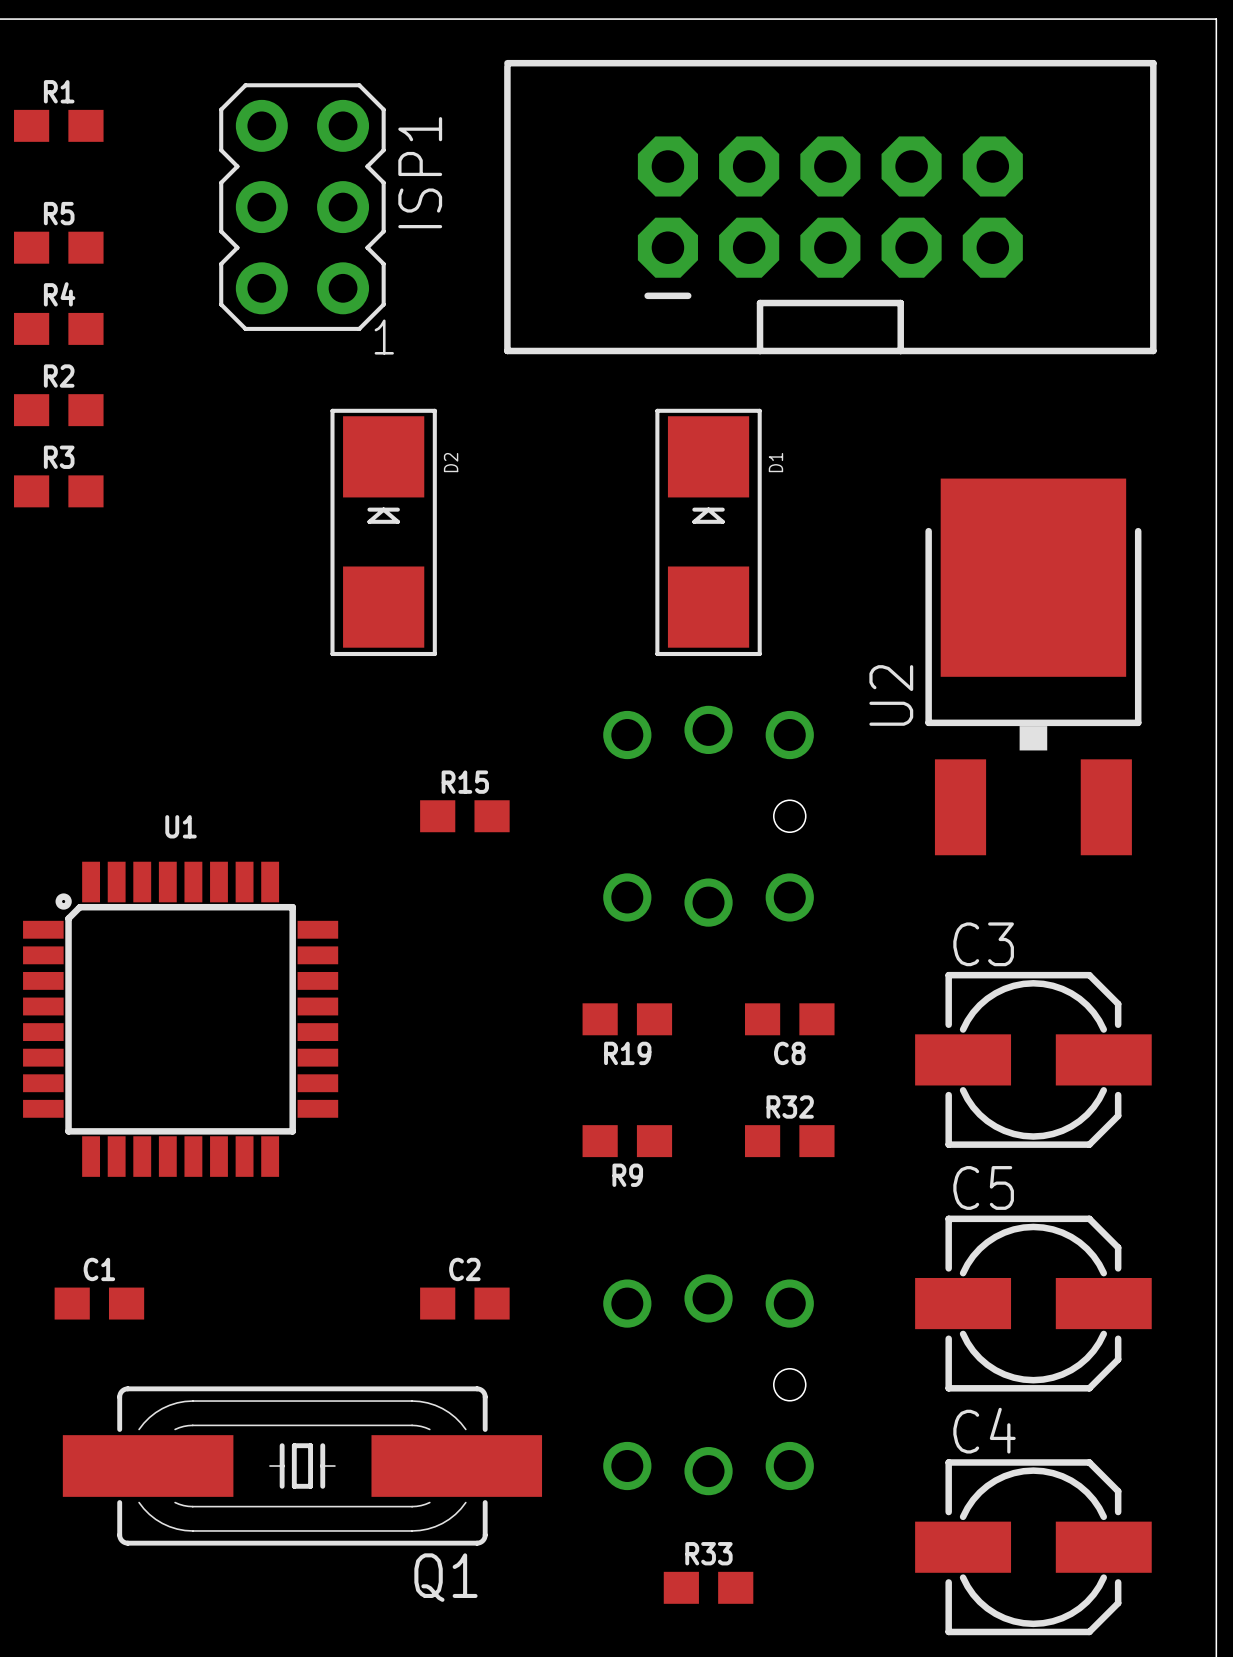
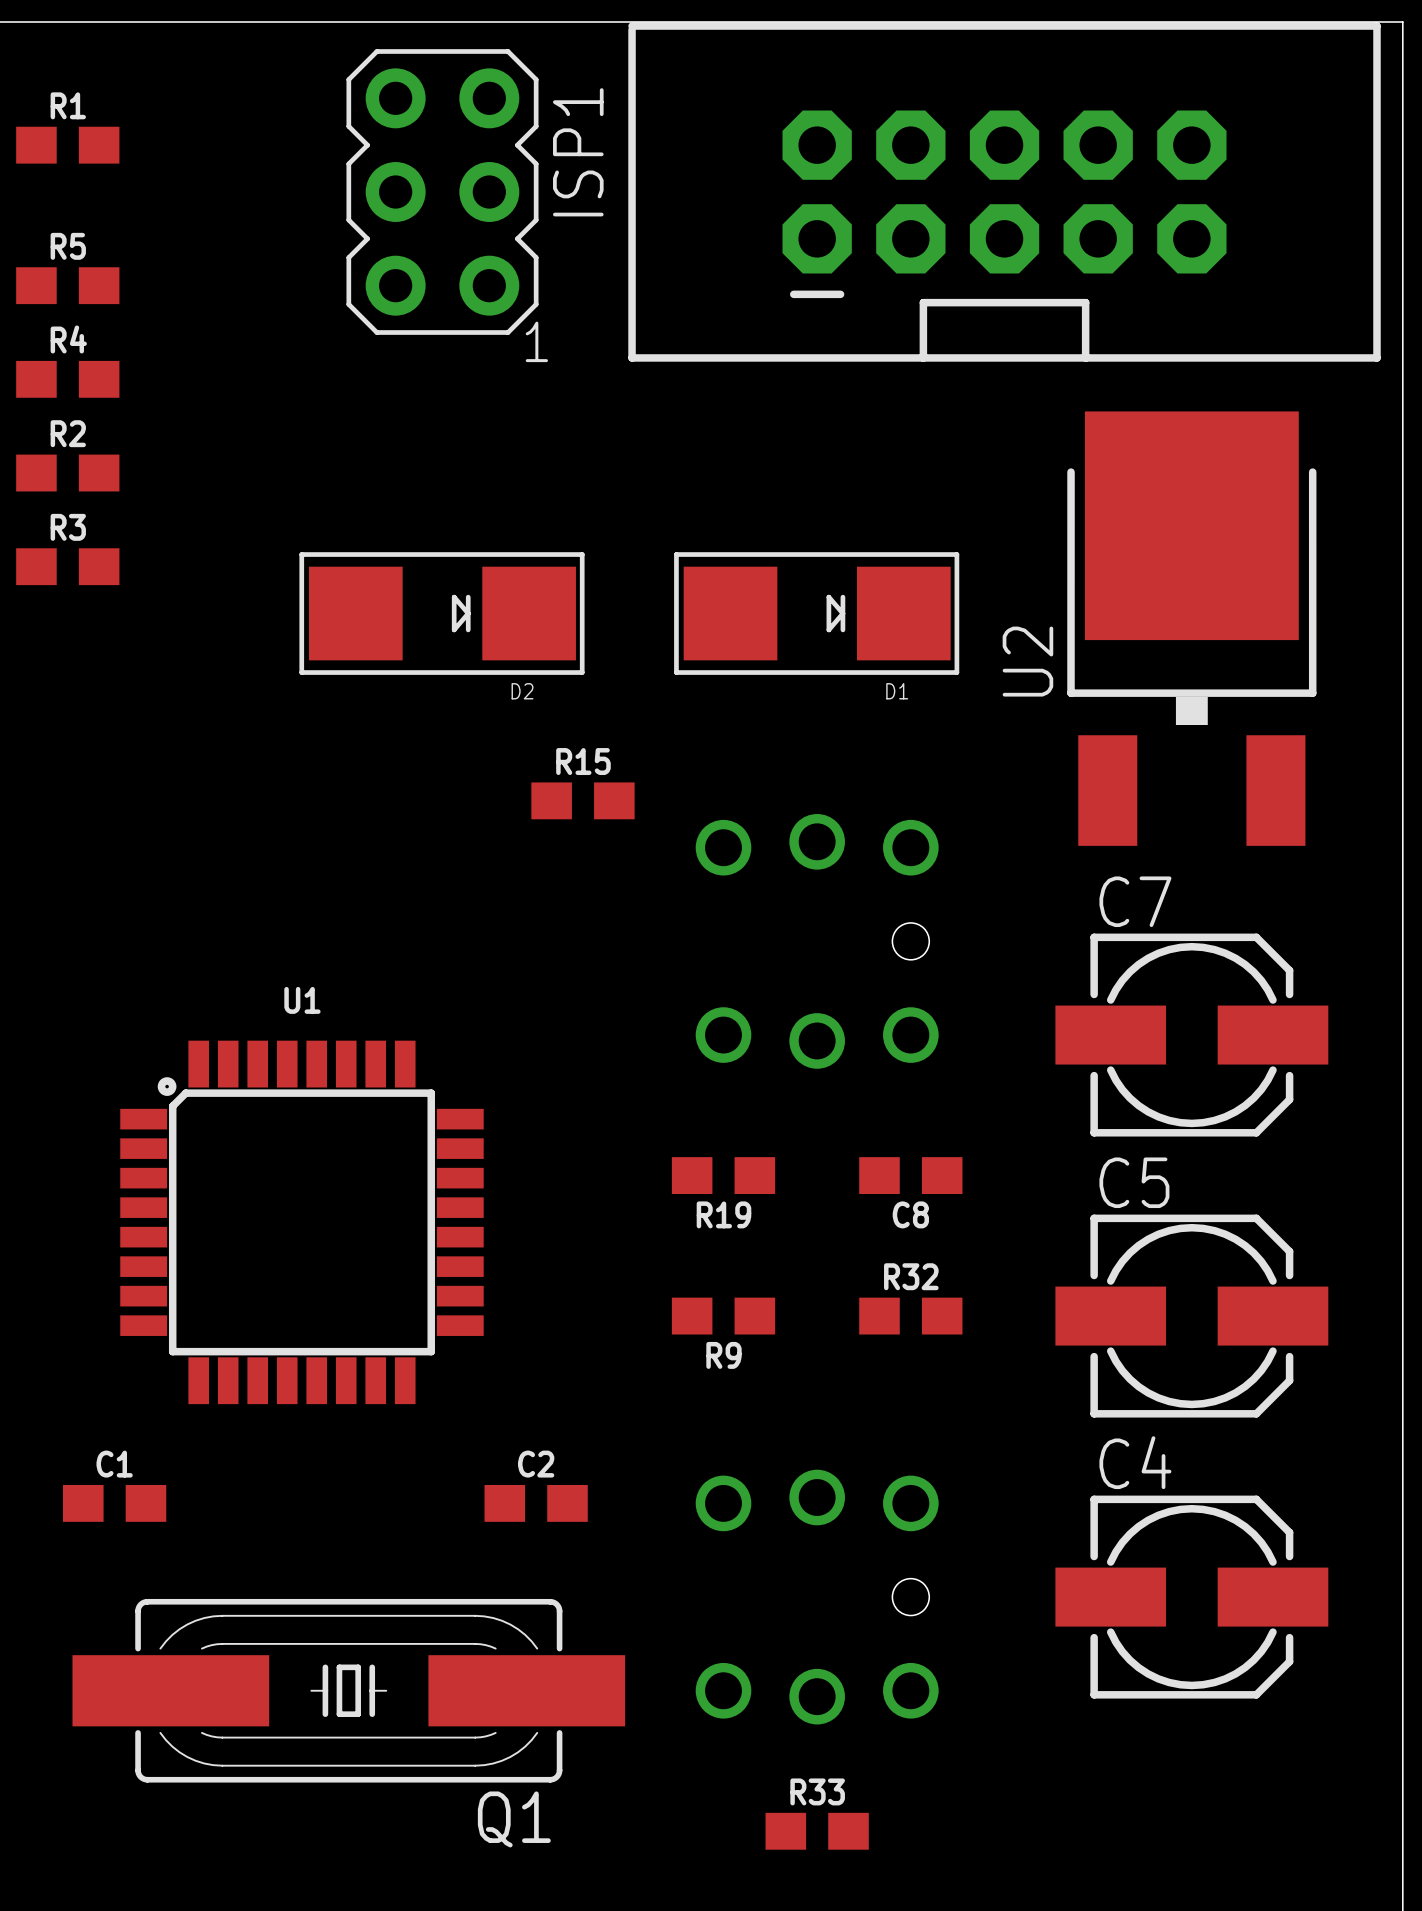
ISP1 position: (302, 207) -> (442, 192)
part position: (830, 207) -> (1004, 192)
D2 rotation: 0° (383, 532) -> 90° clockwise (441, 613)
D1 rotation: 0° (708, 532) -> 90° clockwise (816, 613)
U2 position: (1033, 666) -> (1191, 628)
R15 position: (464, 816) -> (582, 800)
C7: none -> (1191, 1035)
U1 position: (180, 1019) -> (301, 1222)
C3: (1033, 1059) -> none
C5 position: (1033, 1303) -> (1191, 1316)
C4 position: (1033, 1547) -> (1191, 1597)

